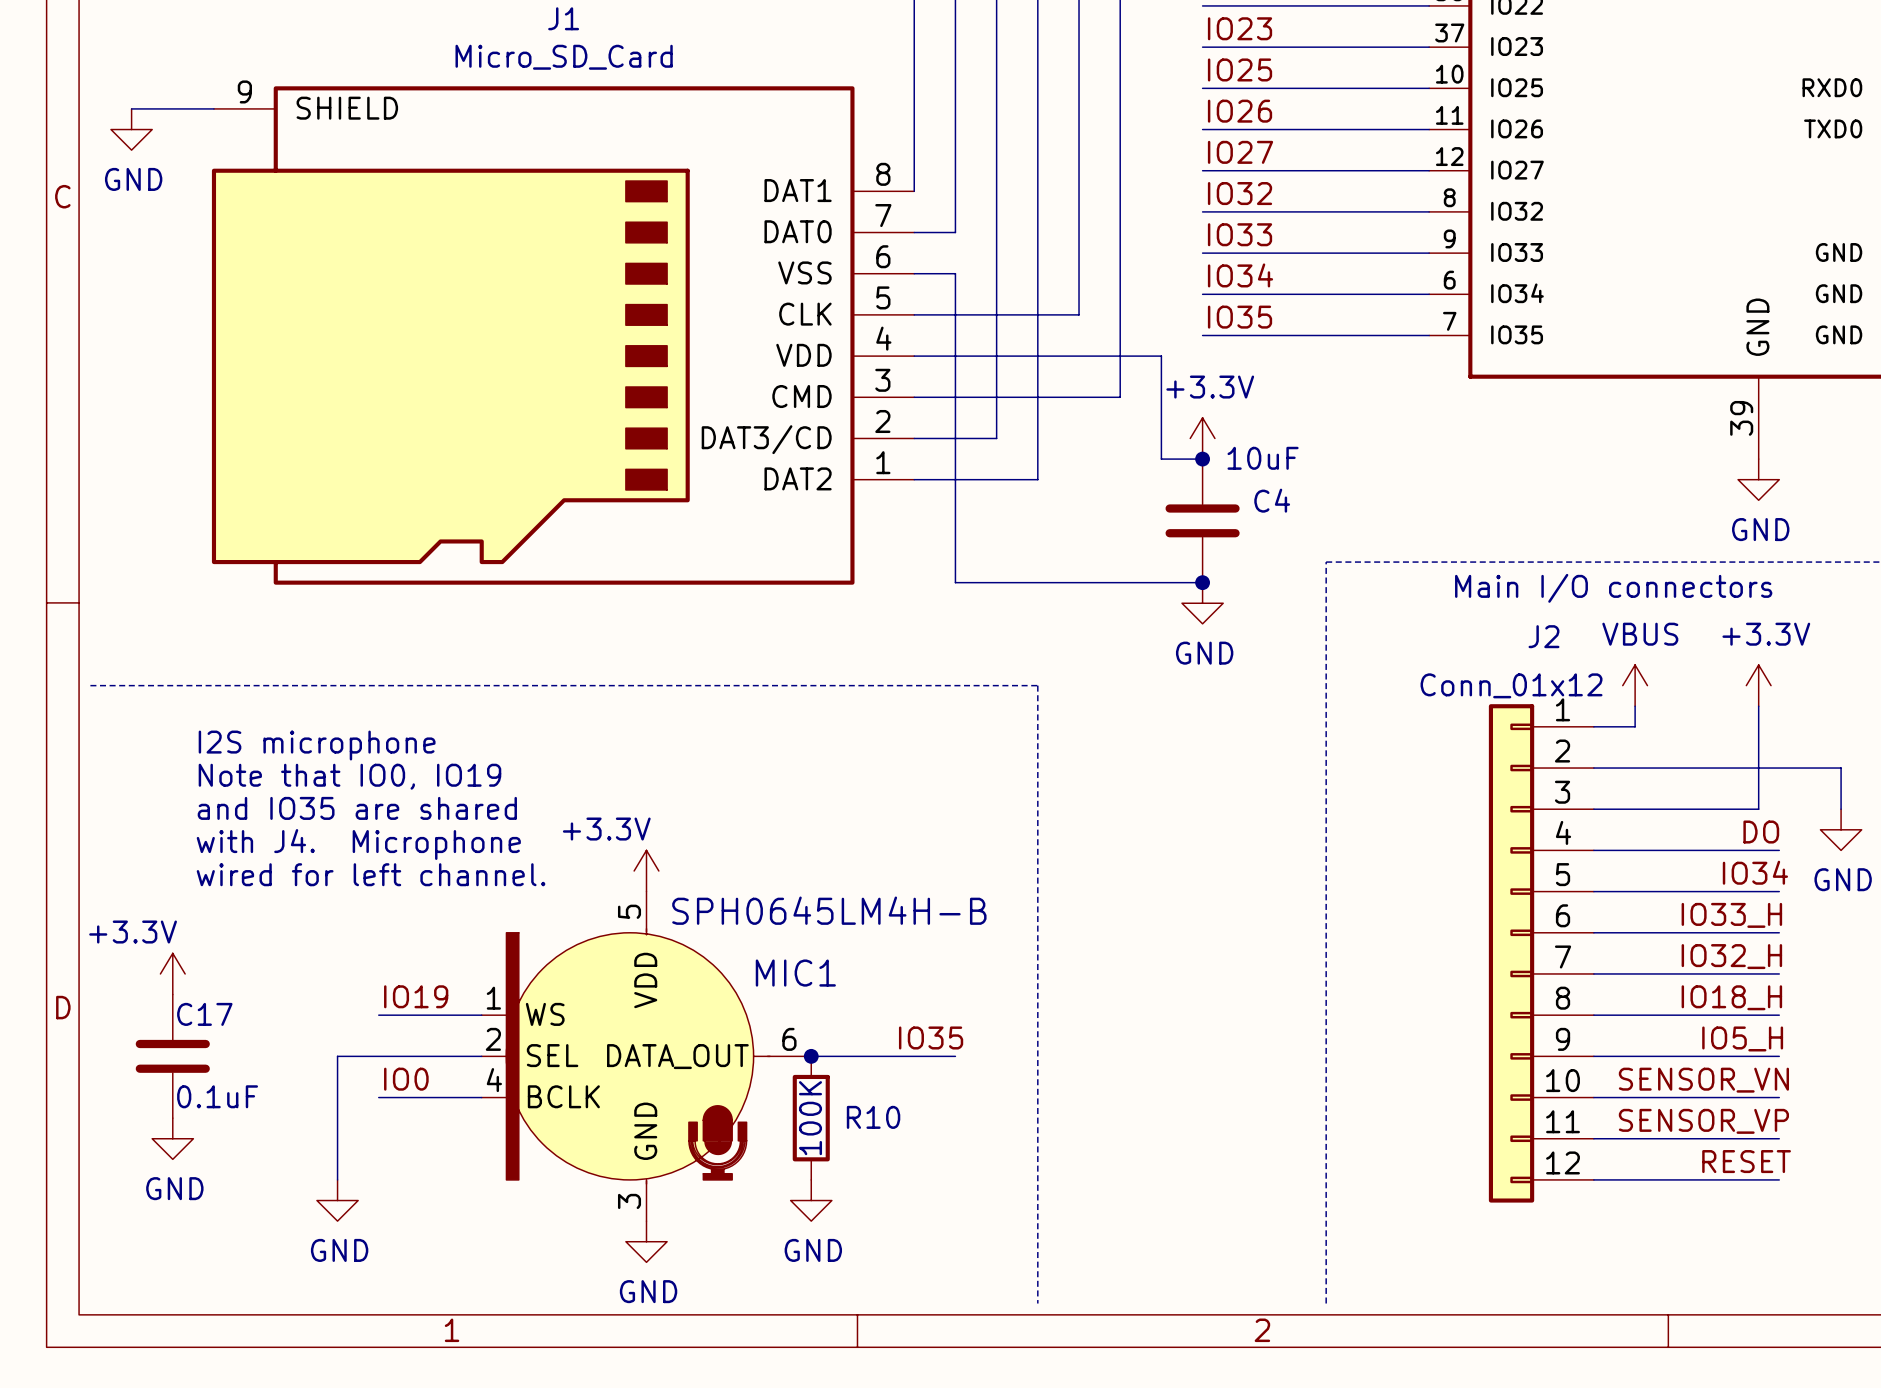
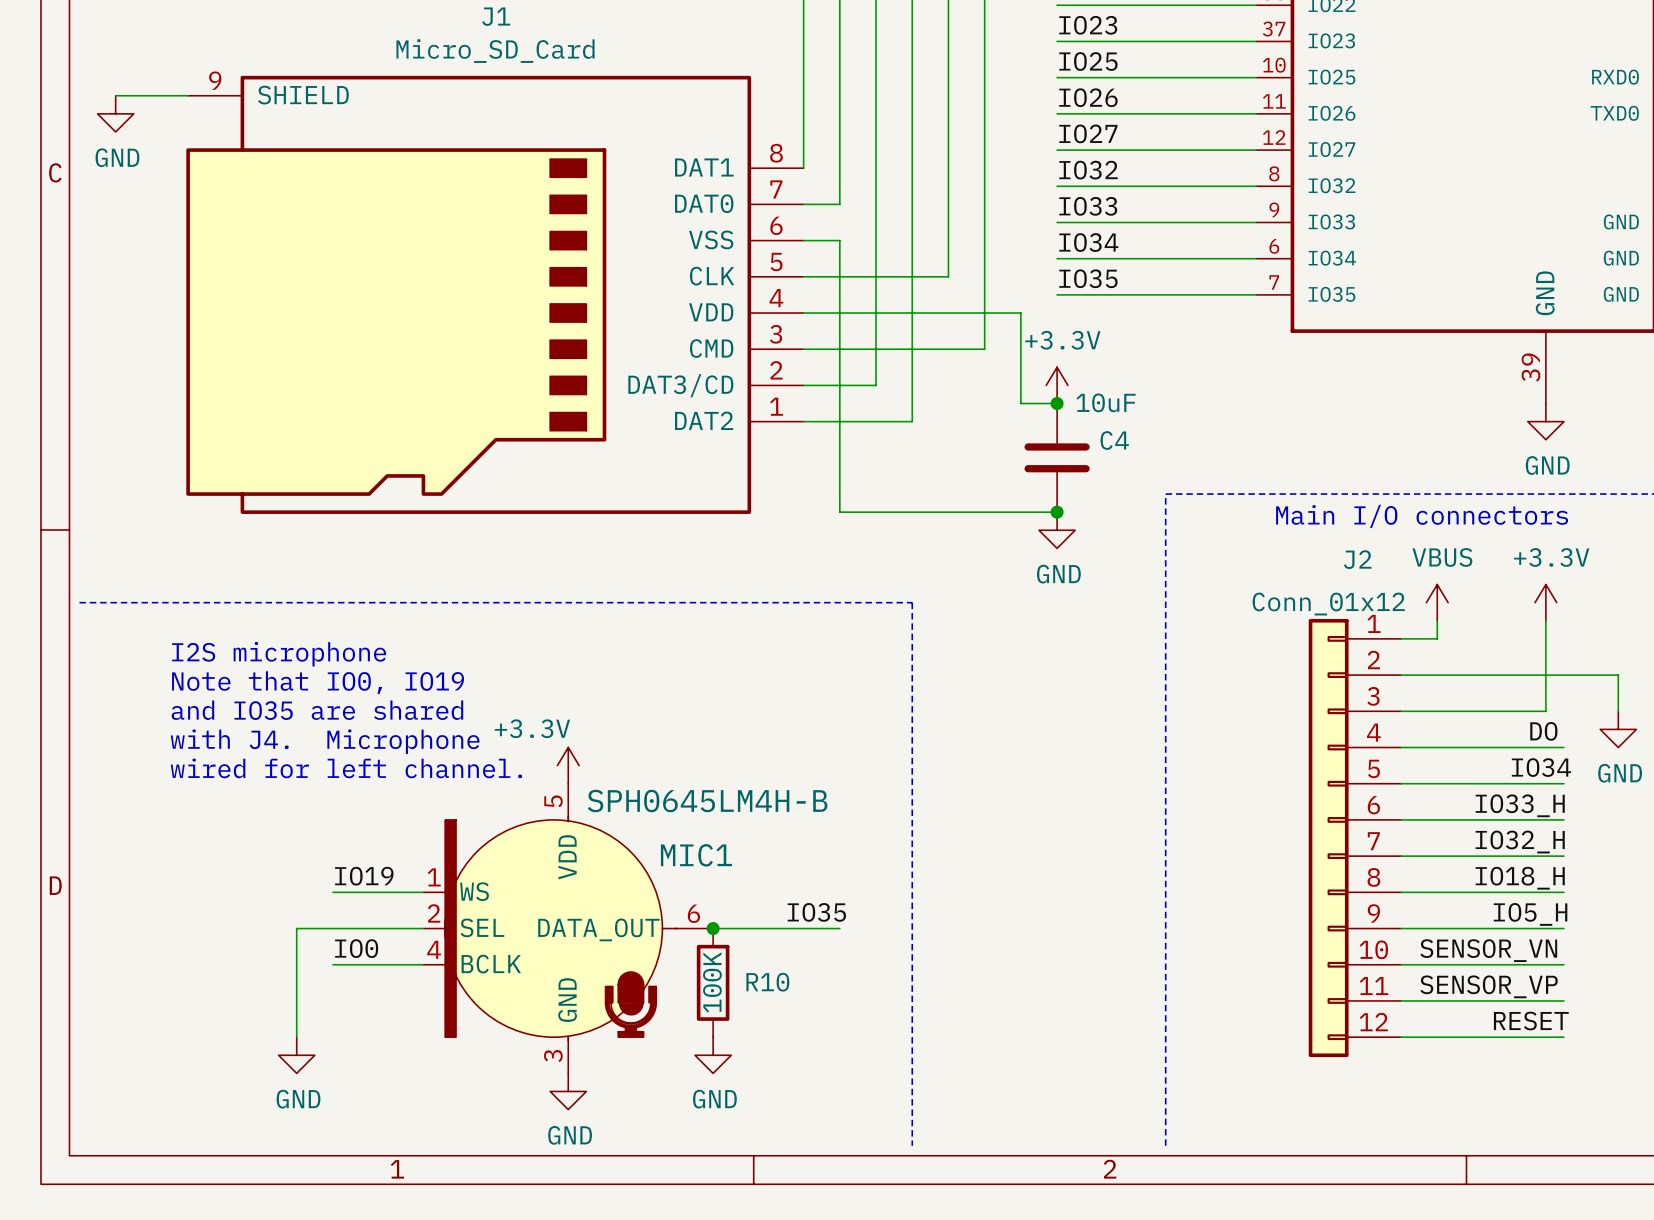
power symbol: +3.3V (172, 973) -> none
C17: 0.1uF (172, 1056) -> none
power symbol: GND (172, 1138) -> none

